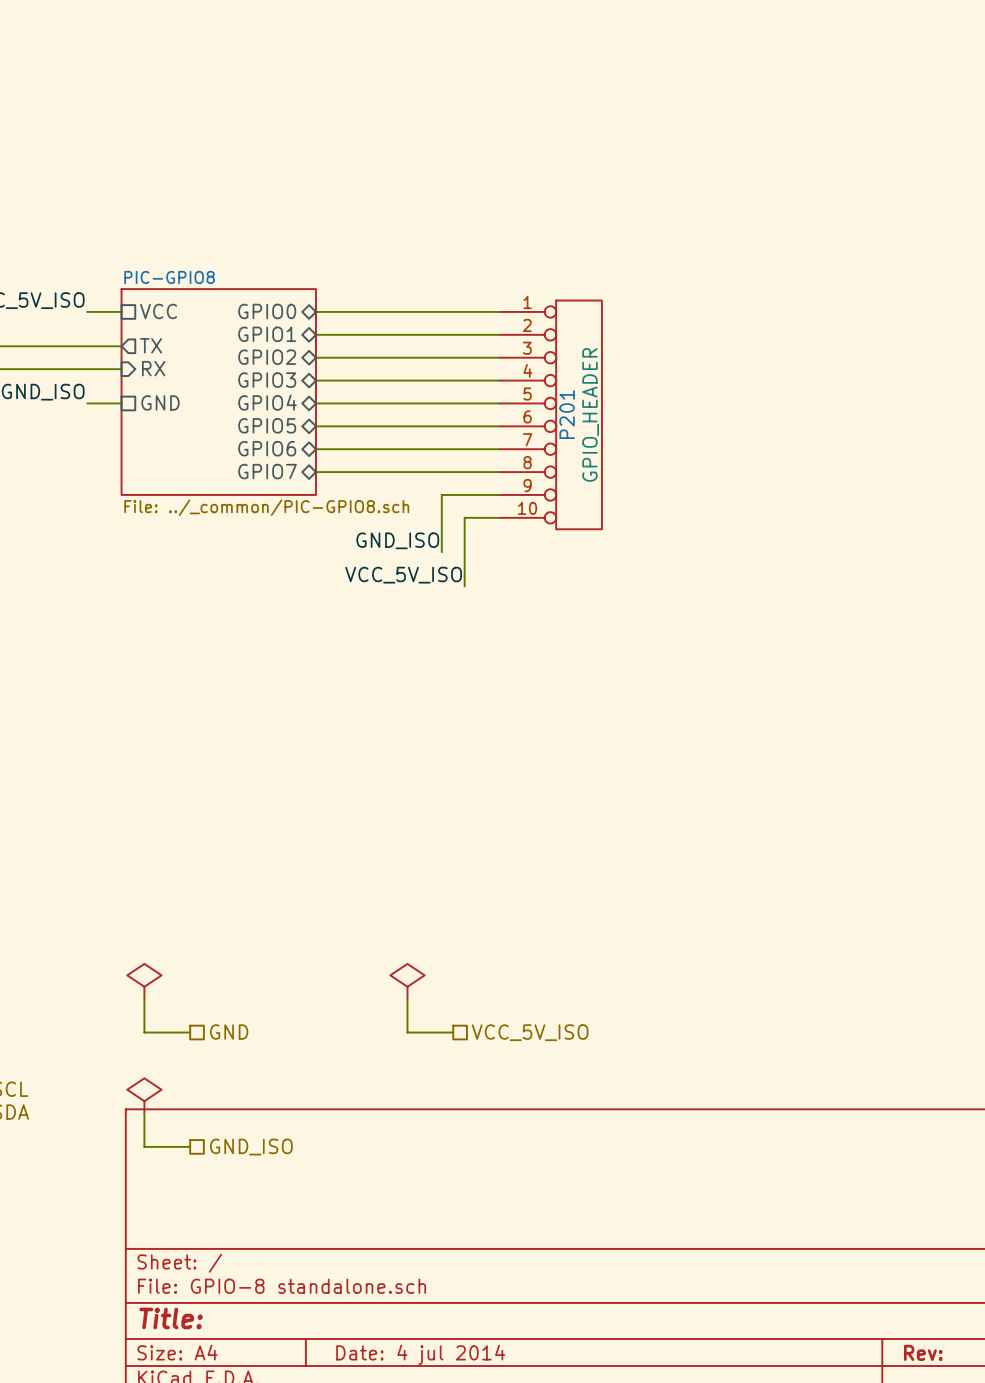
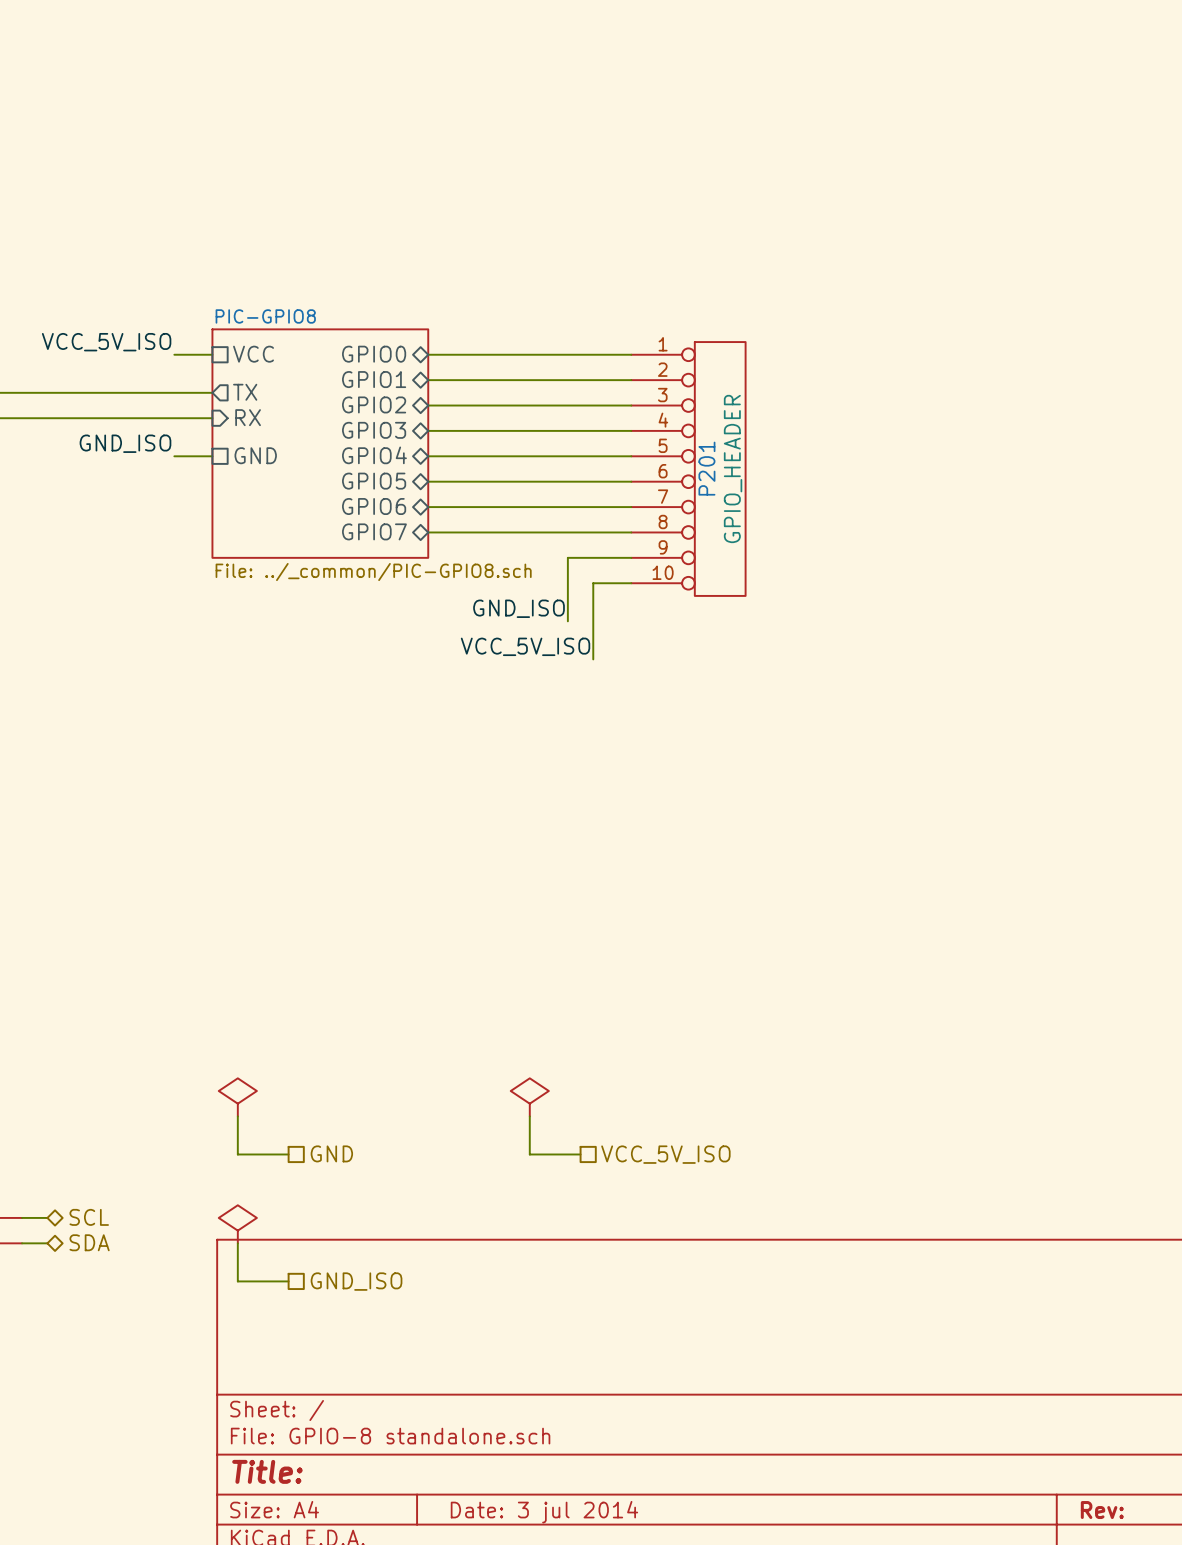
title block: Date: 4 jul 2014 (420, 1354) -> Date: 3 jul 2014 (544, 1512)

